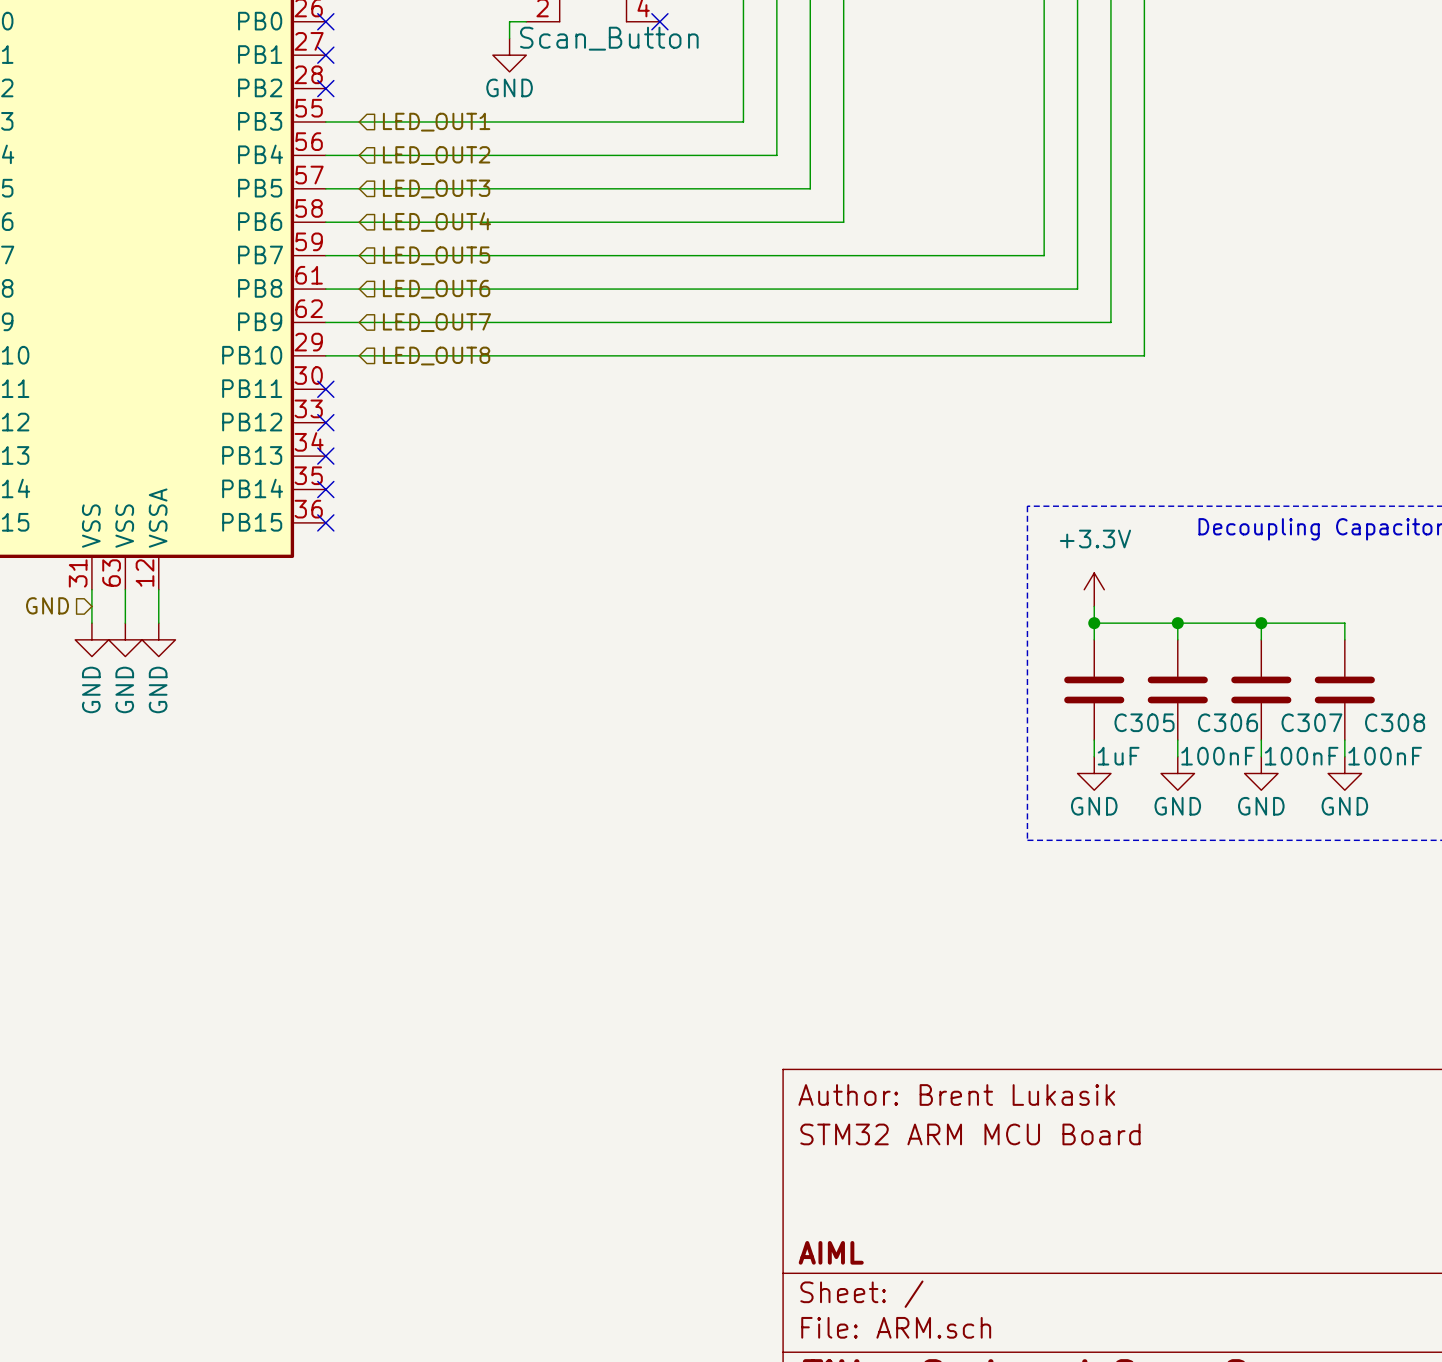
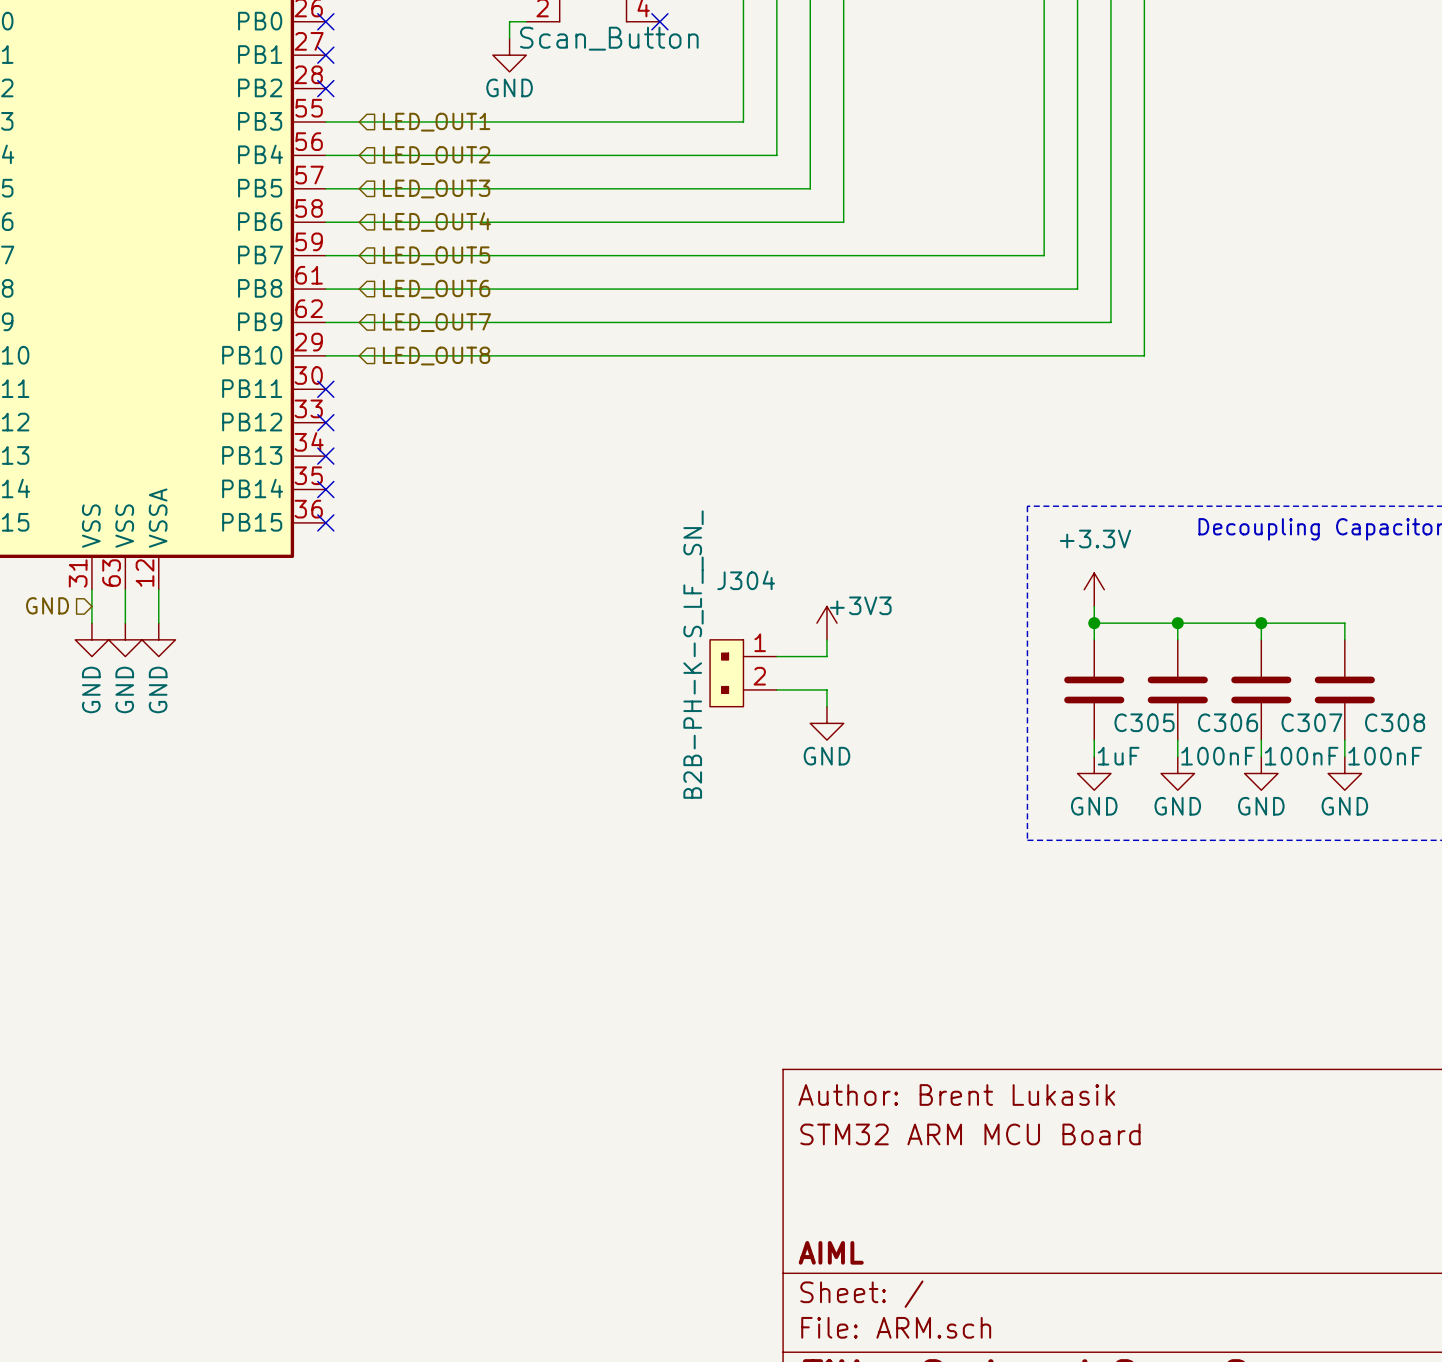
power symbol: none -> +3V3 (826, 623)
wire: none -> (826, 639) (826, 656) (776, 656)
J304: none -> B2B-PH-K-S_LF__SN_ (743, 673)
wire: none -> (776, 689) (826, 689) (826, 706)
power symbol: none -> GND (826, 723)

